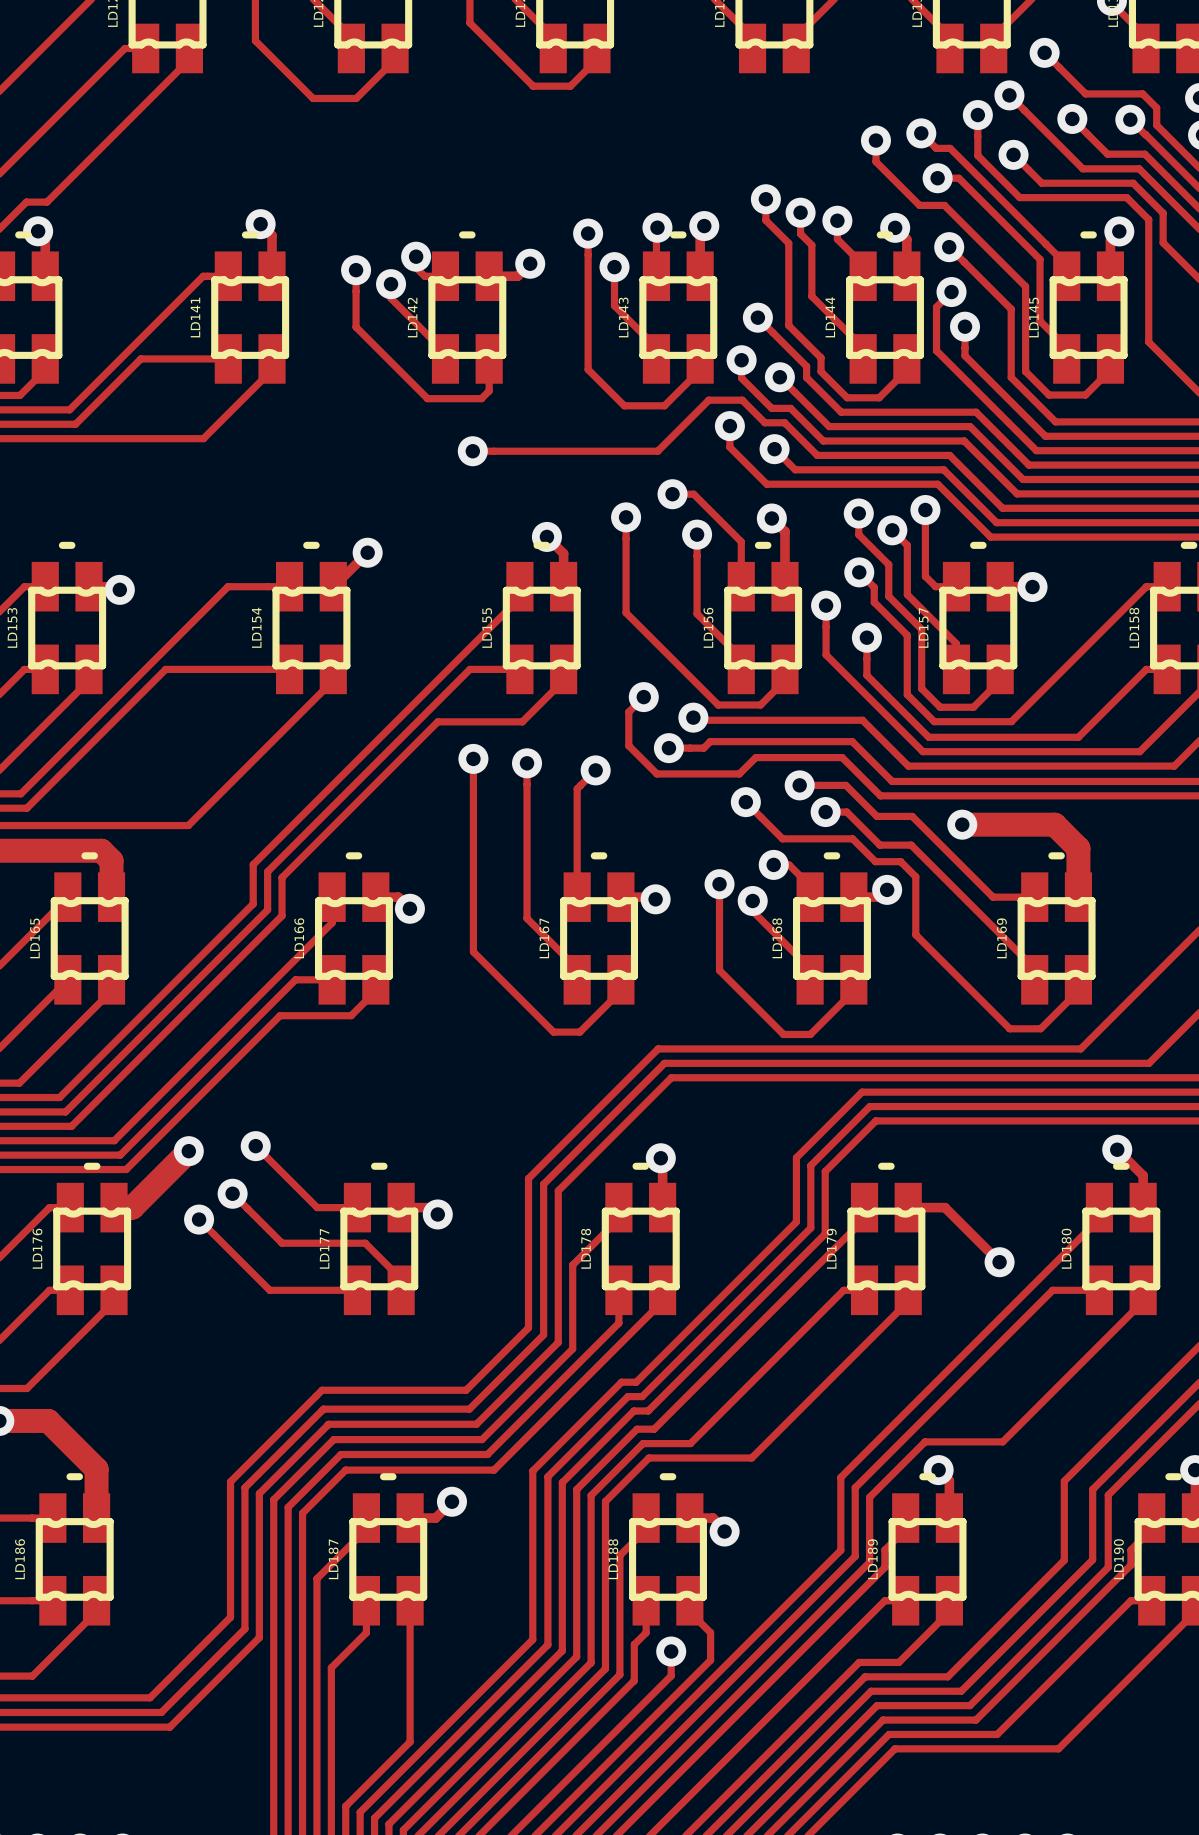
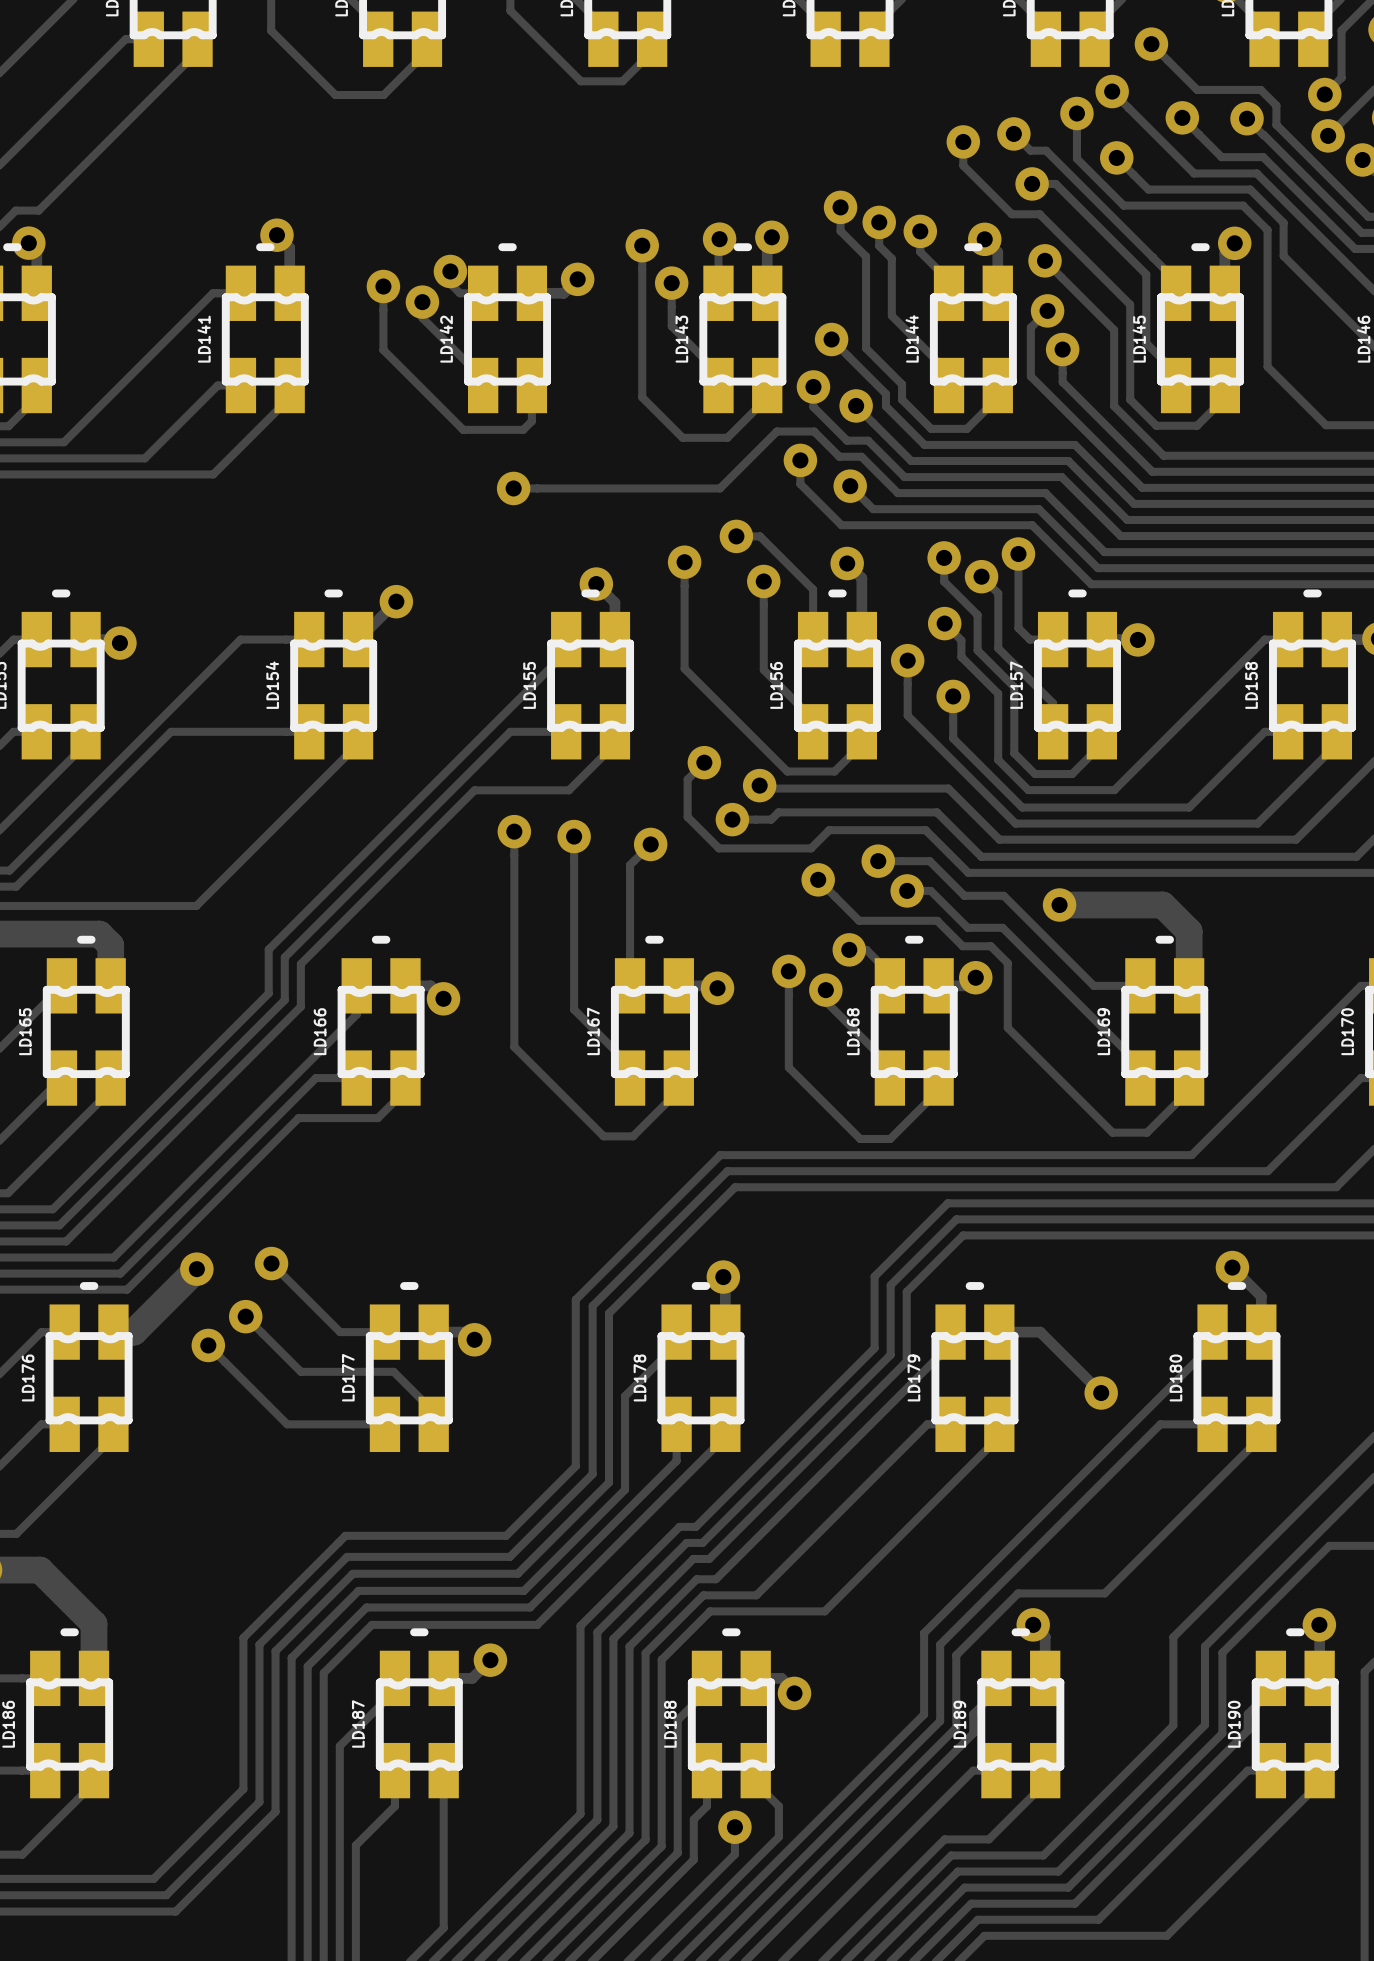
track: (207, 358) (140, 358) (75, 424) -> (217, 385) (144, 458) (70, 458)

